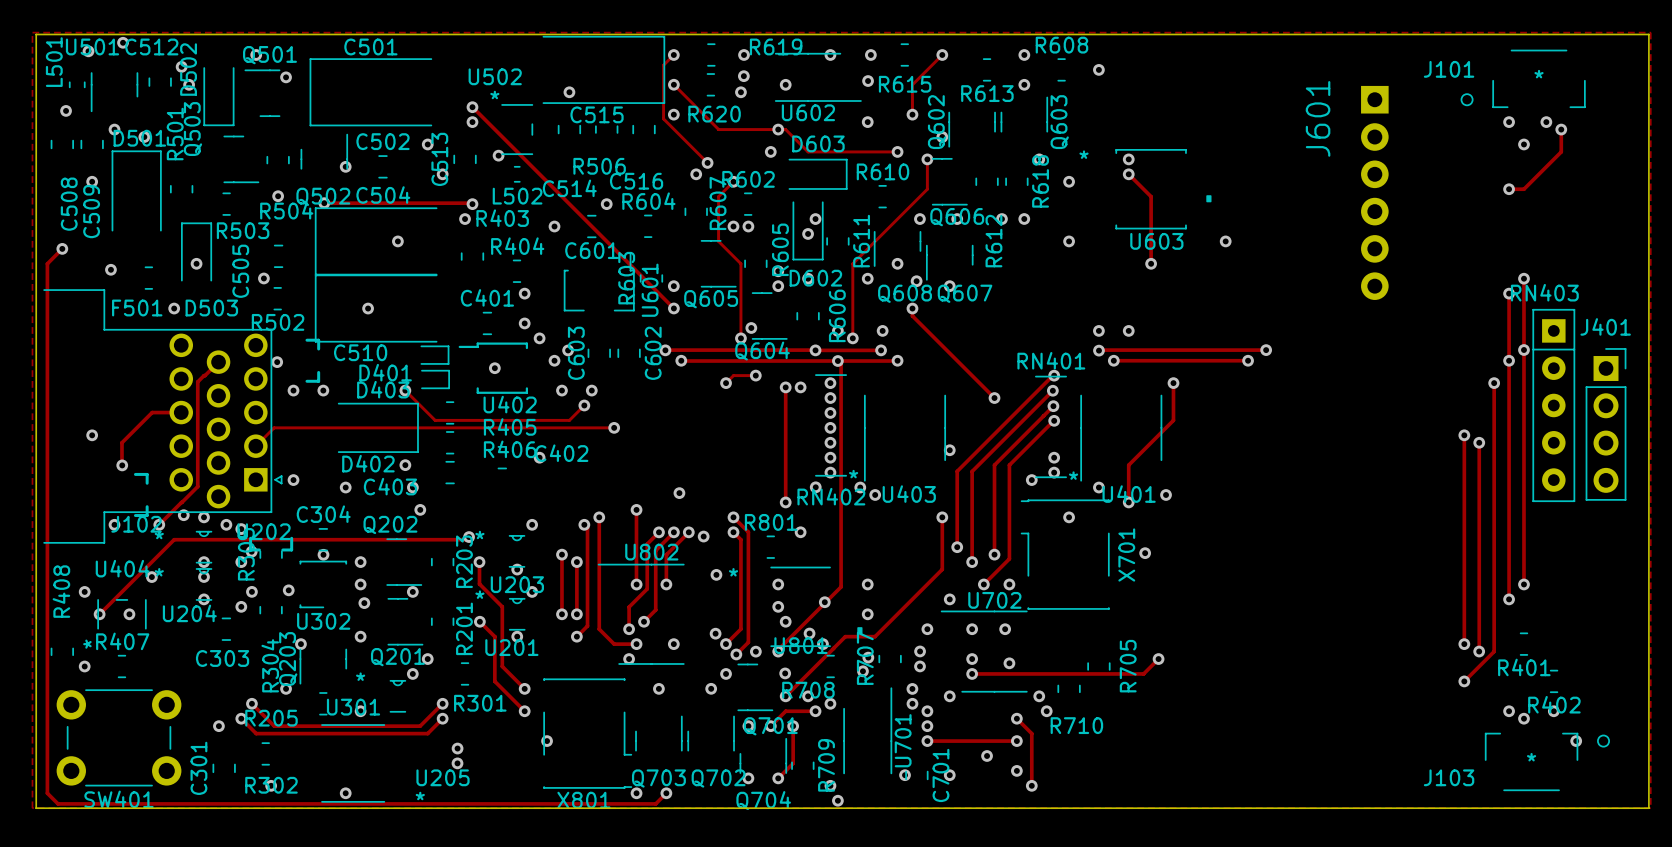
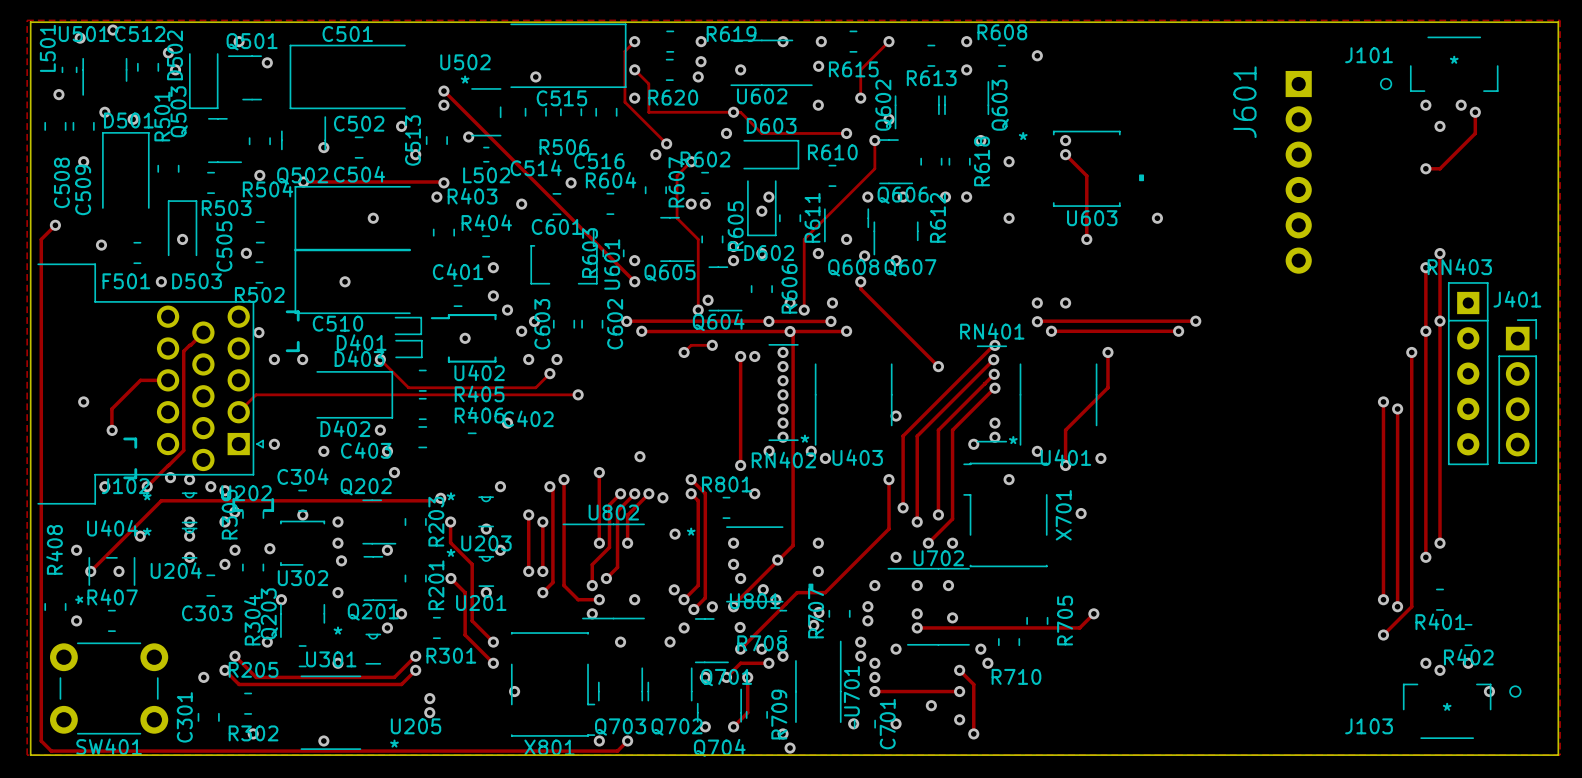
track: (688, 99) (718, 129) -> (648, 83) (648, 112) (677, 112)

